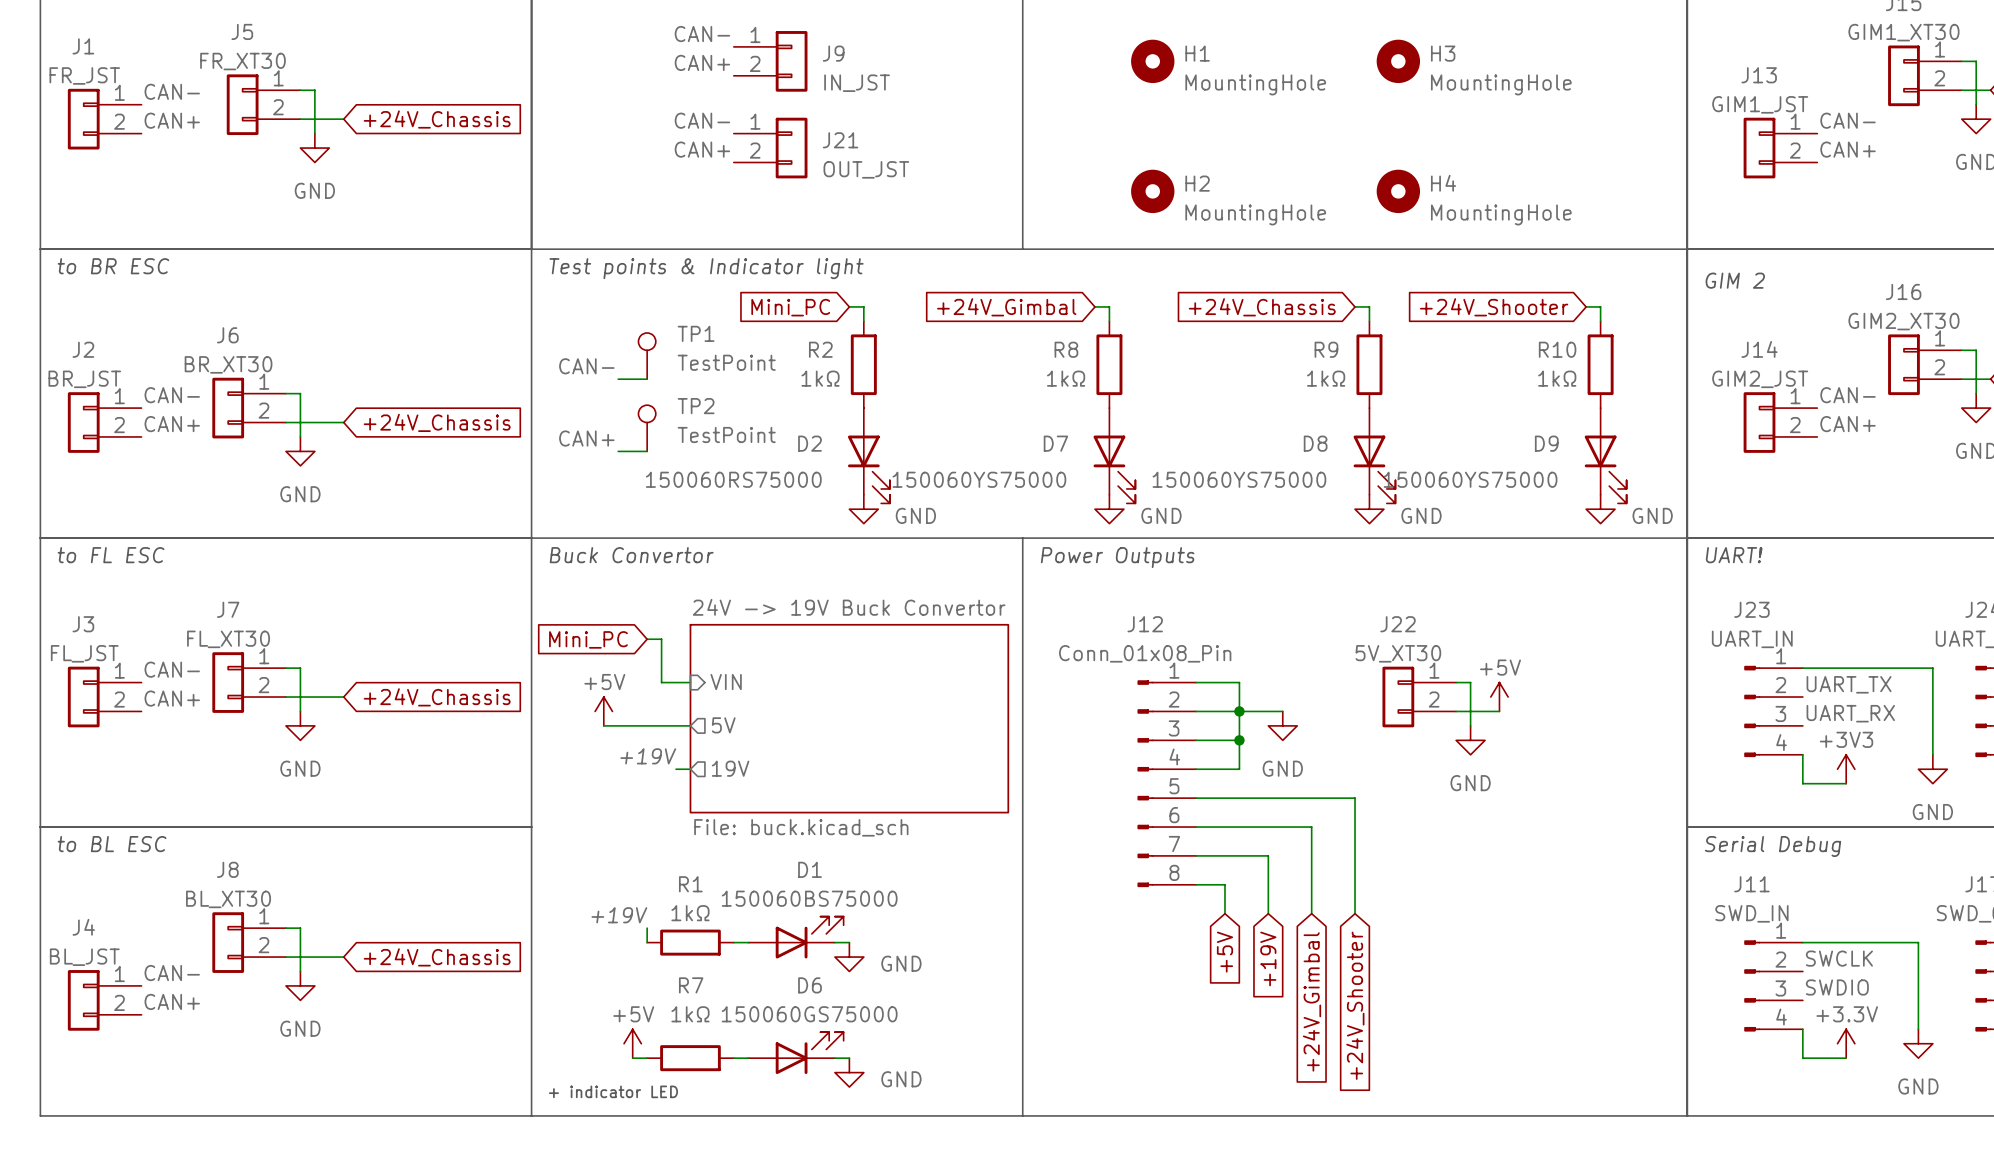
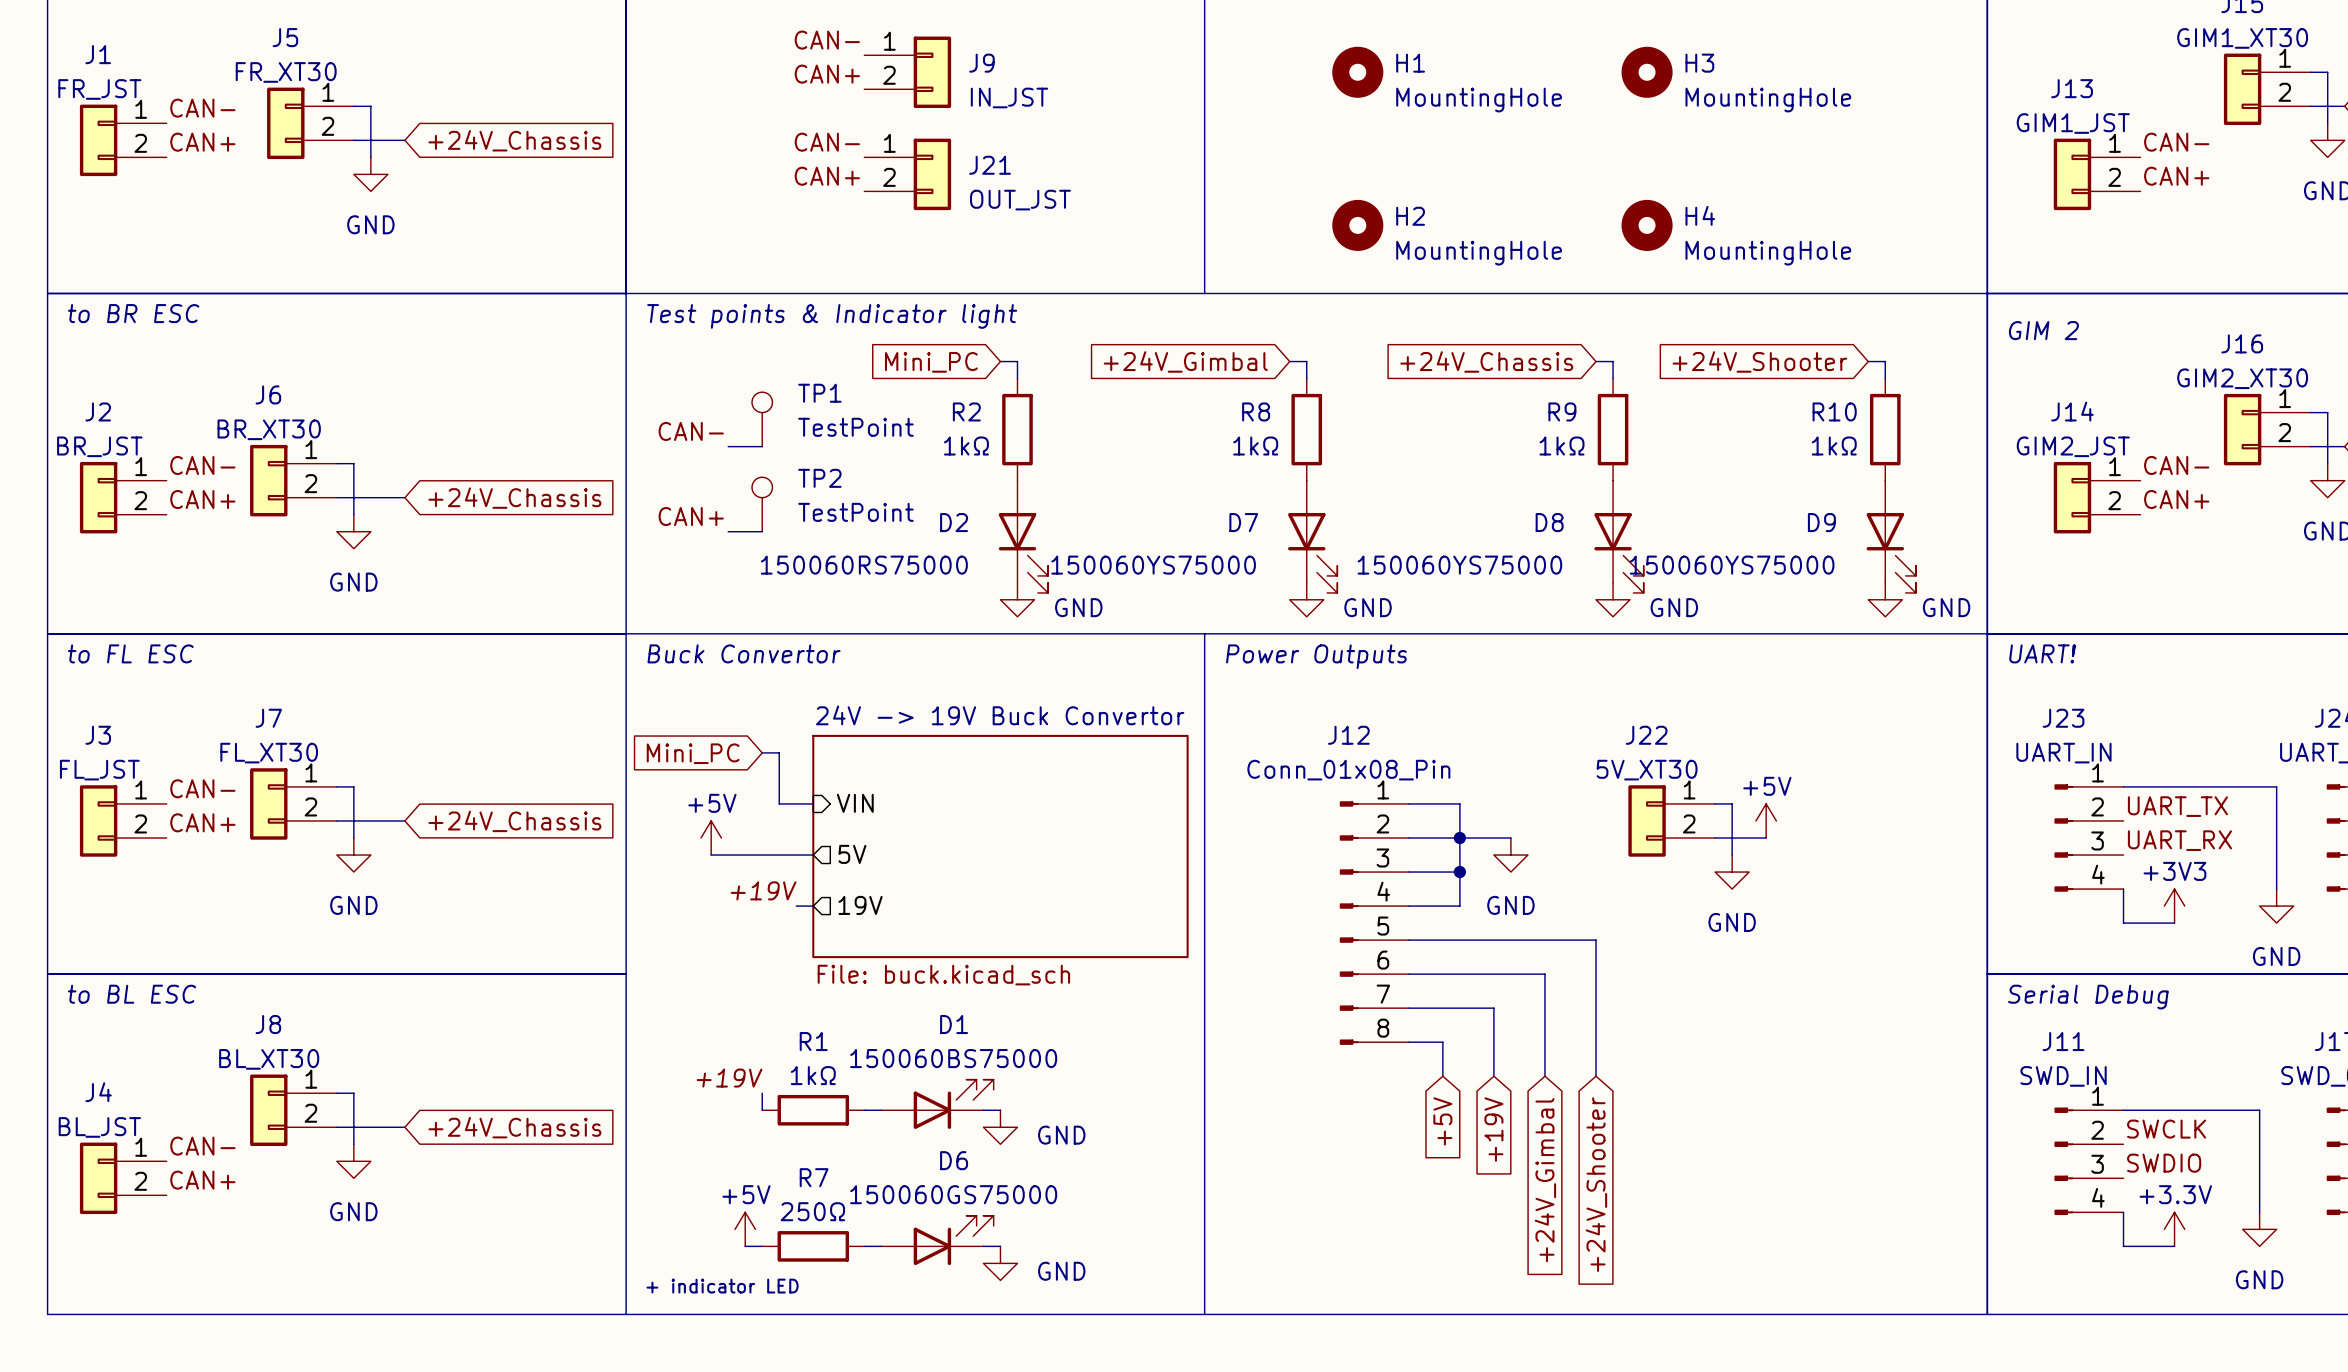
R7 name position: R7 (691, 985) -> R7 (814, 1177)
R7 value: 1kΩ (690, 1014) -> 250Ω (812, 1211)

